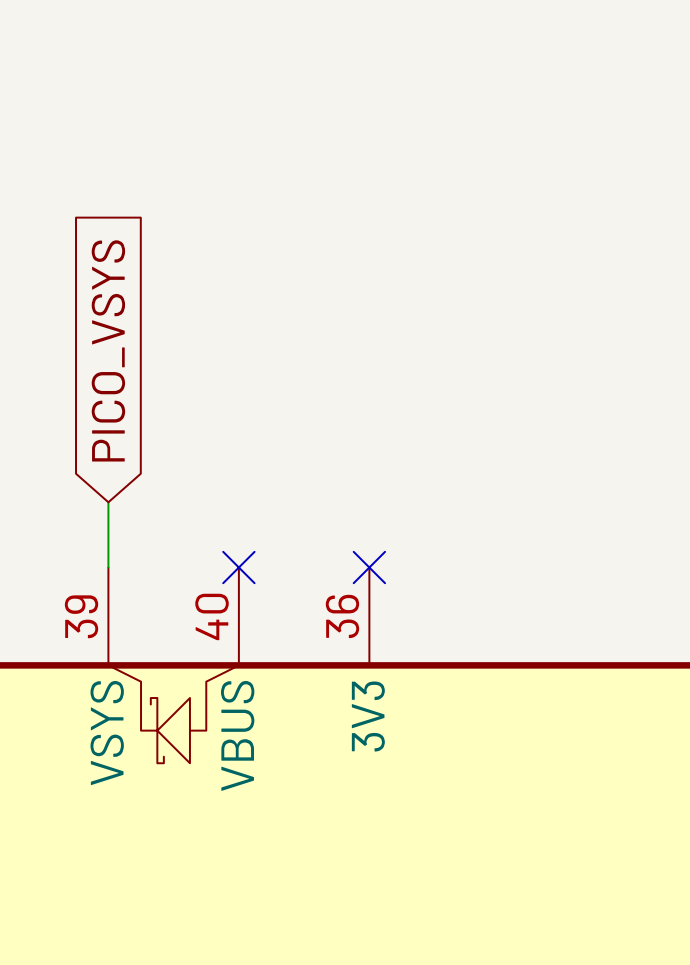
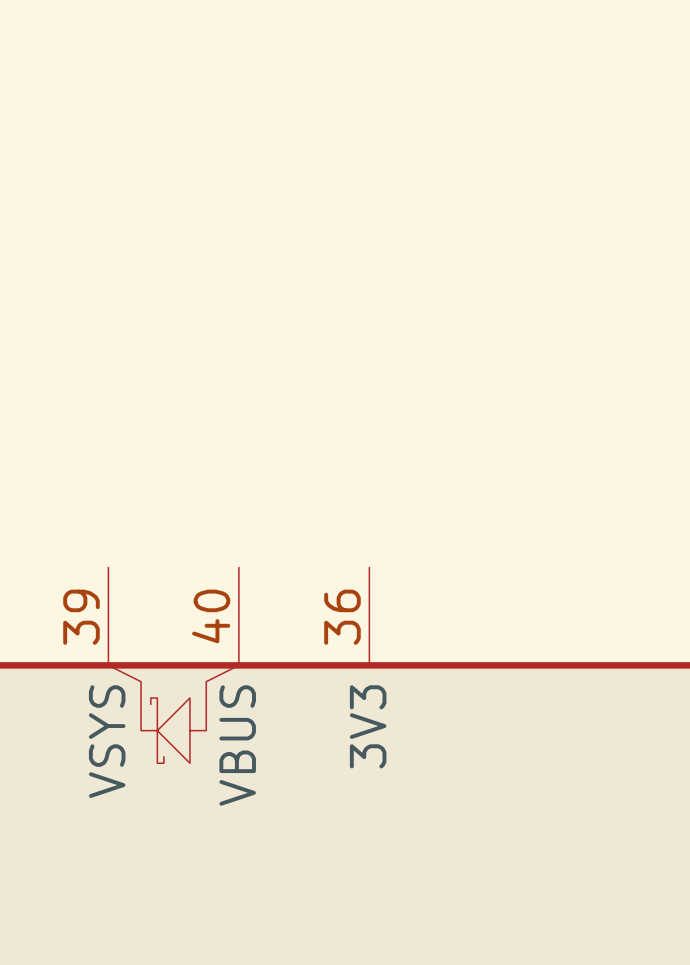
global label: PICO_VSYS (108, 350) -> none
wire: (108, 502) (108, 567) -> none
no-connect mark: (238, 567) -> none
no-connect mark: (369, 567) -> none

